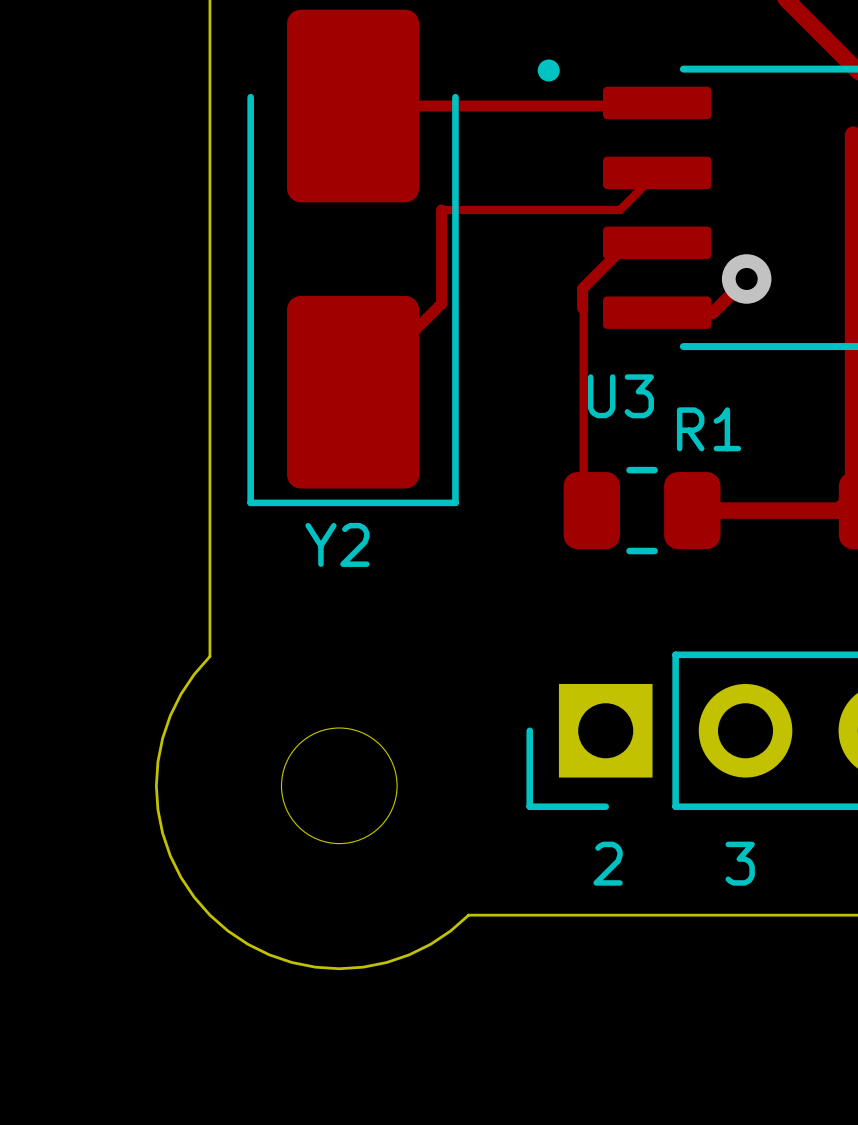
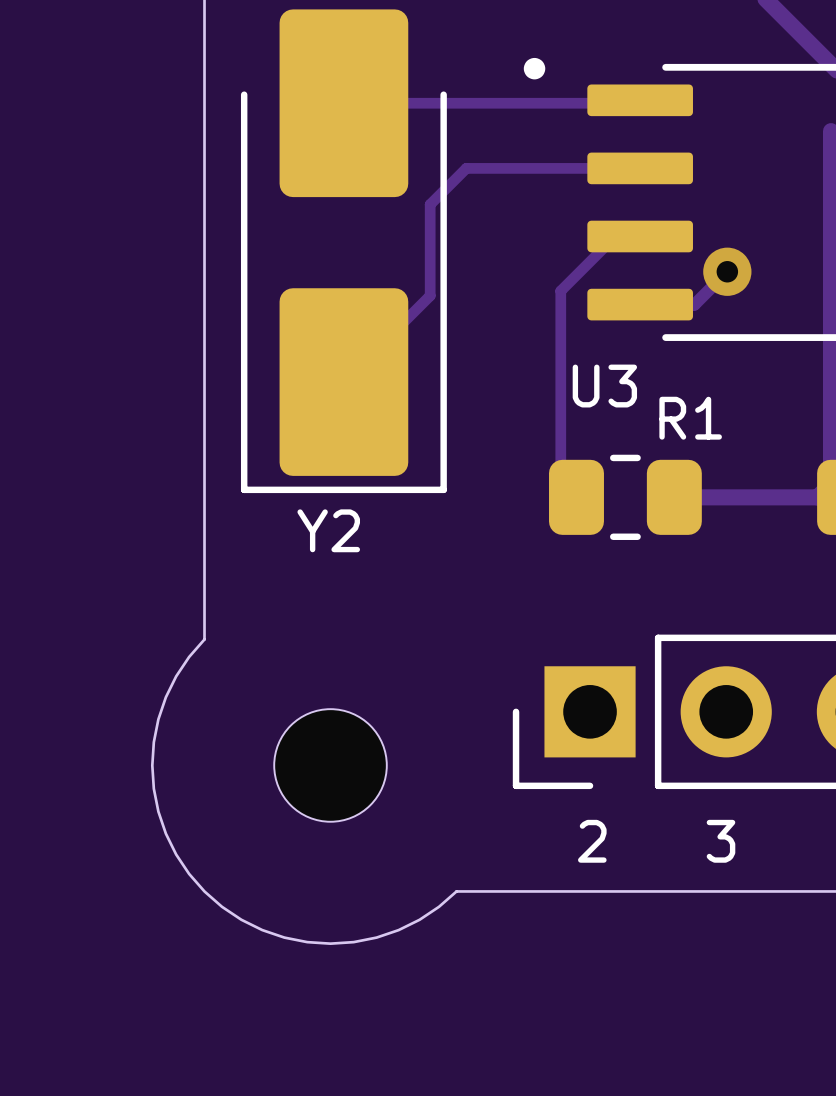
track: (657, 172) (620, 210) (441, 210) -> (640, 168) (466, 168) (430, 204)
track: (628, 242) (582, 288) (583, 510) -> none
track: none -> (615, 236) (560, 291) (560, 481) (576, 497)

